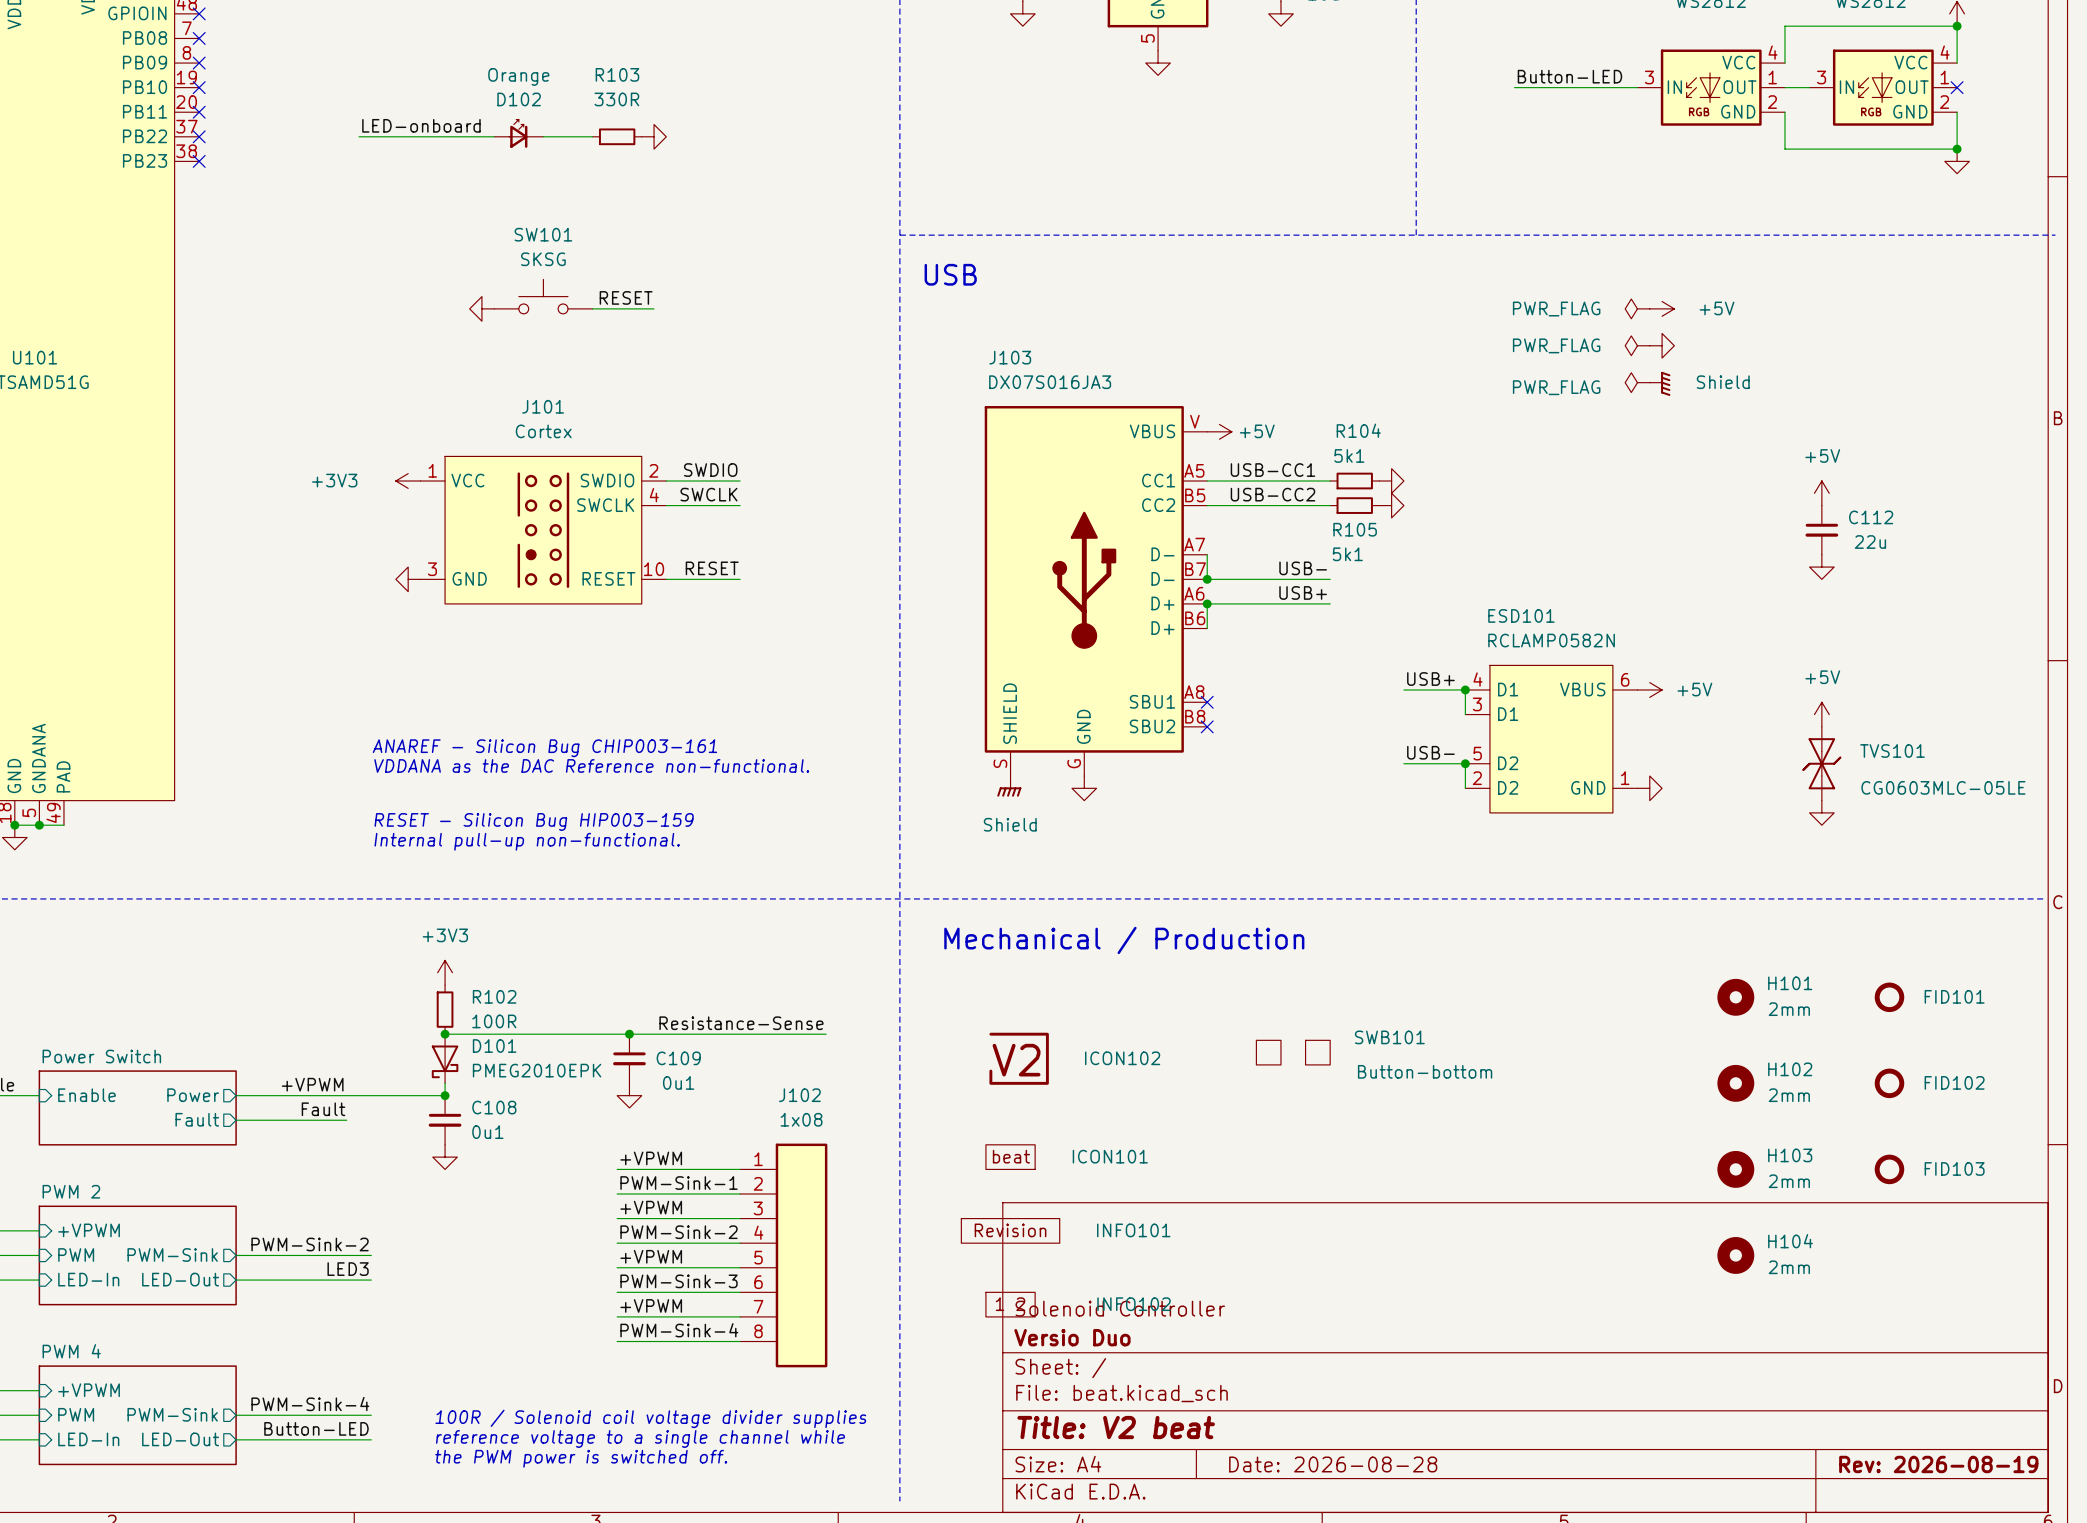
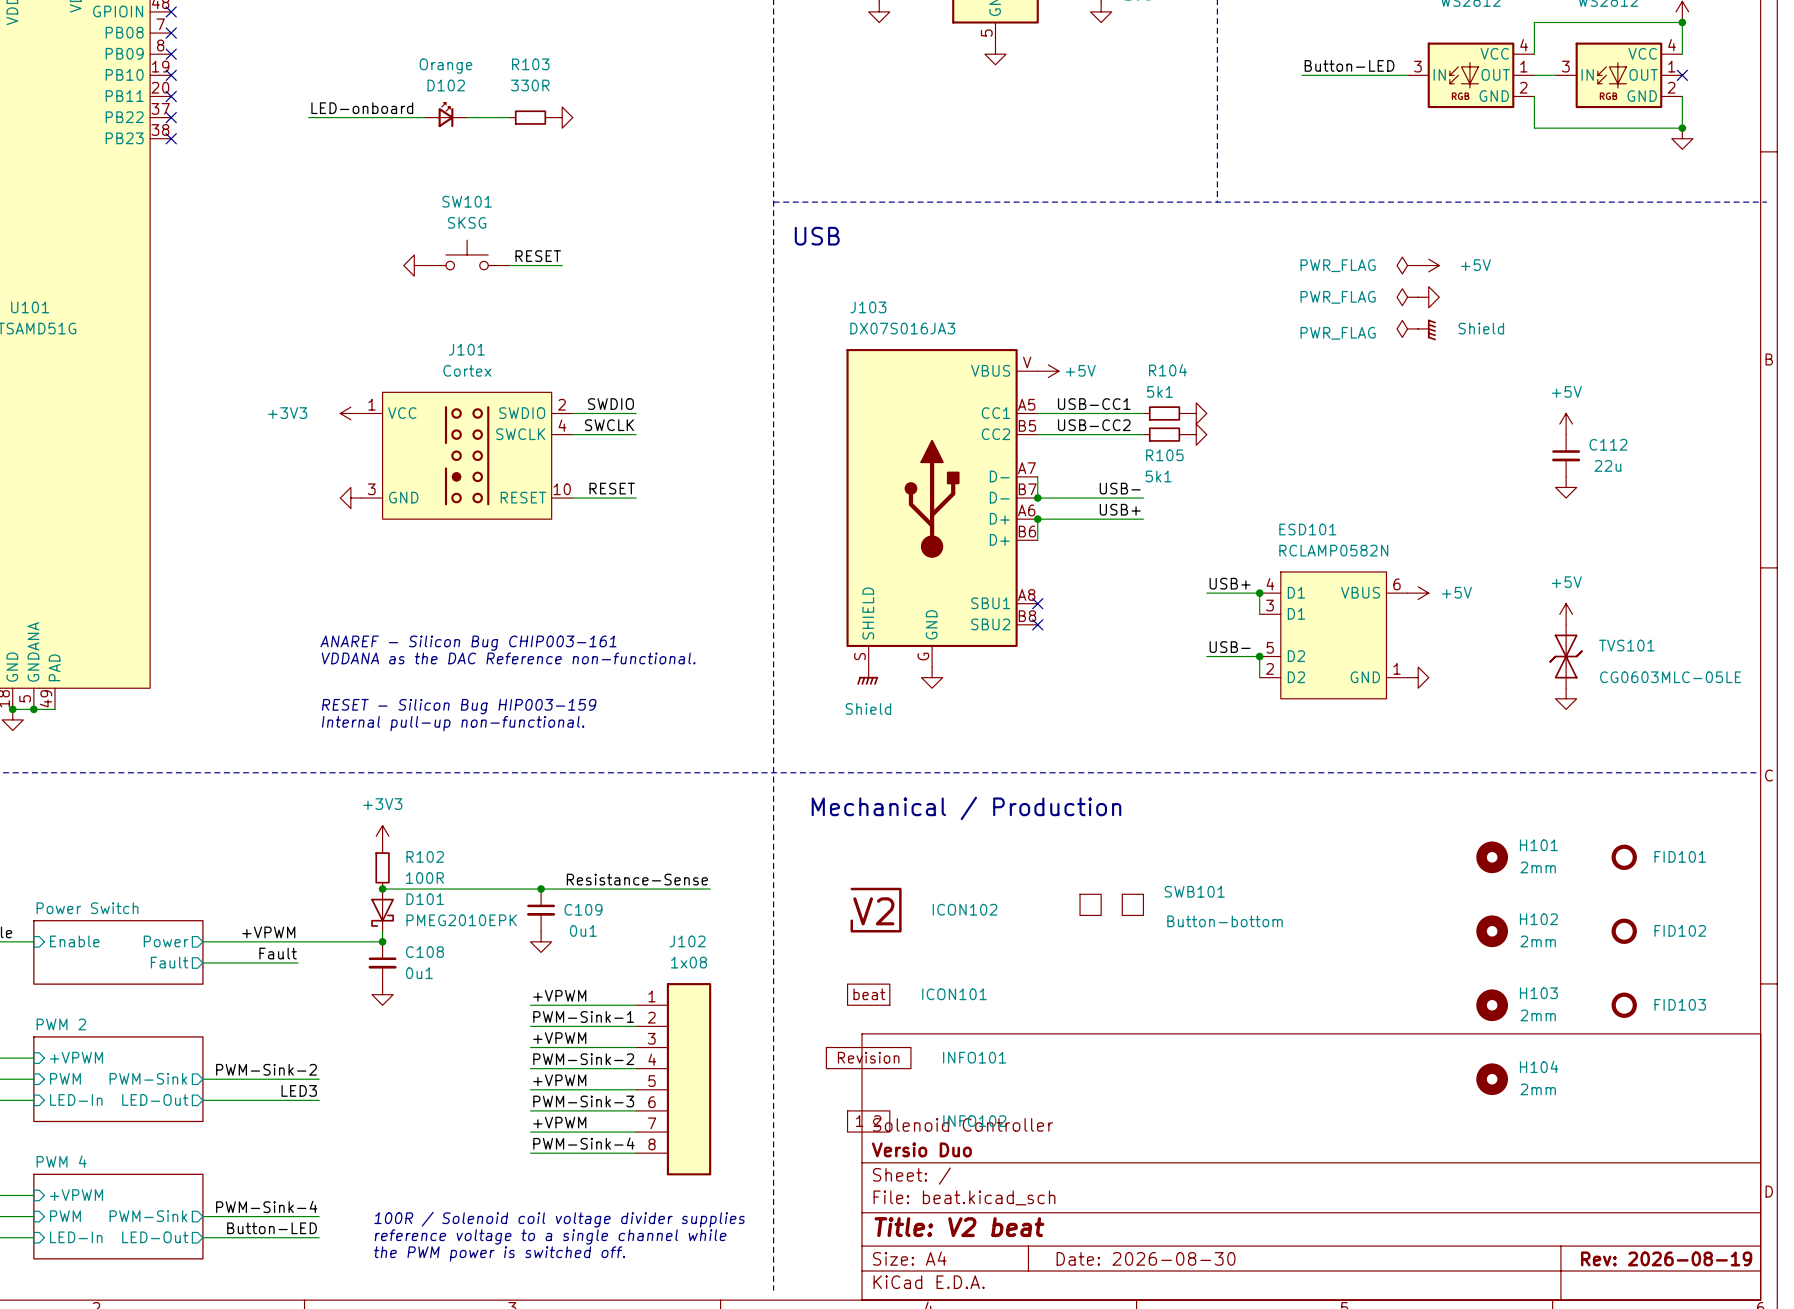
title block: Date: 2026-08-28 (1333, 1464) -> Date: 2026-08-30 (1146, 1258)

